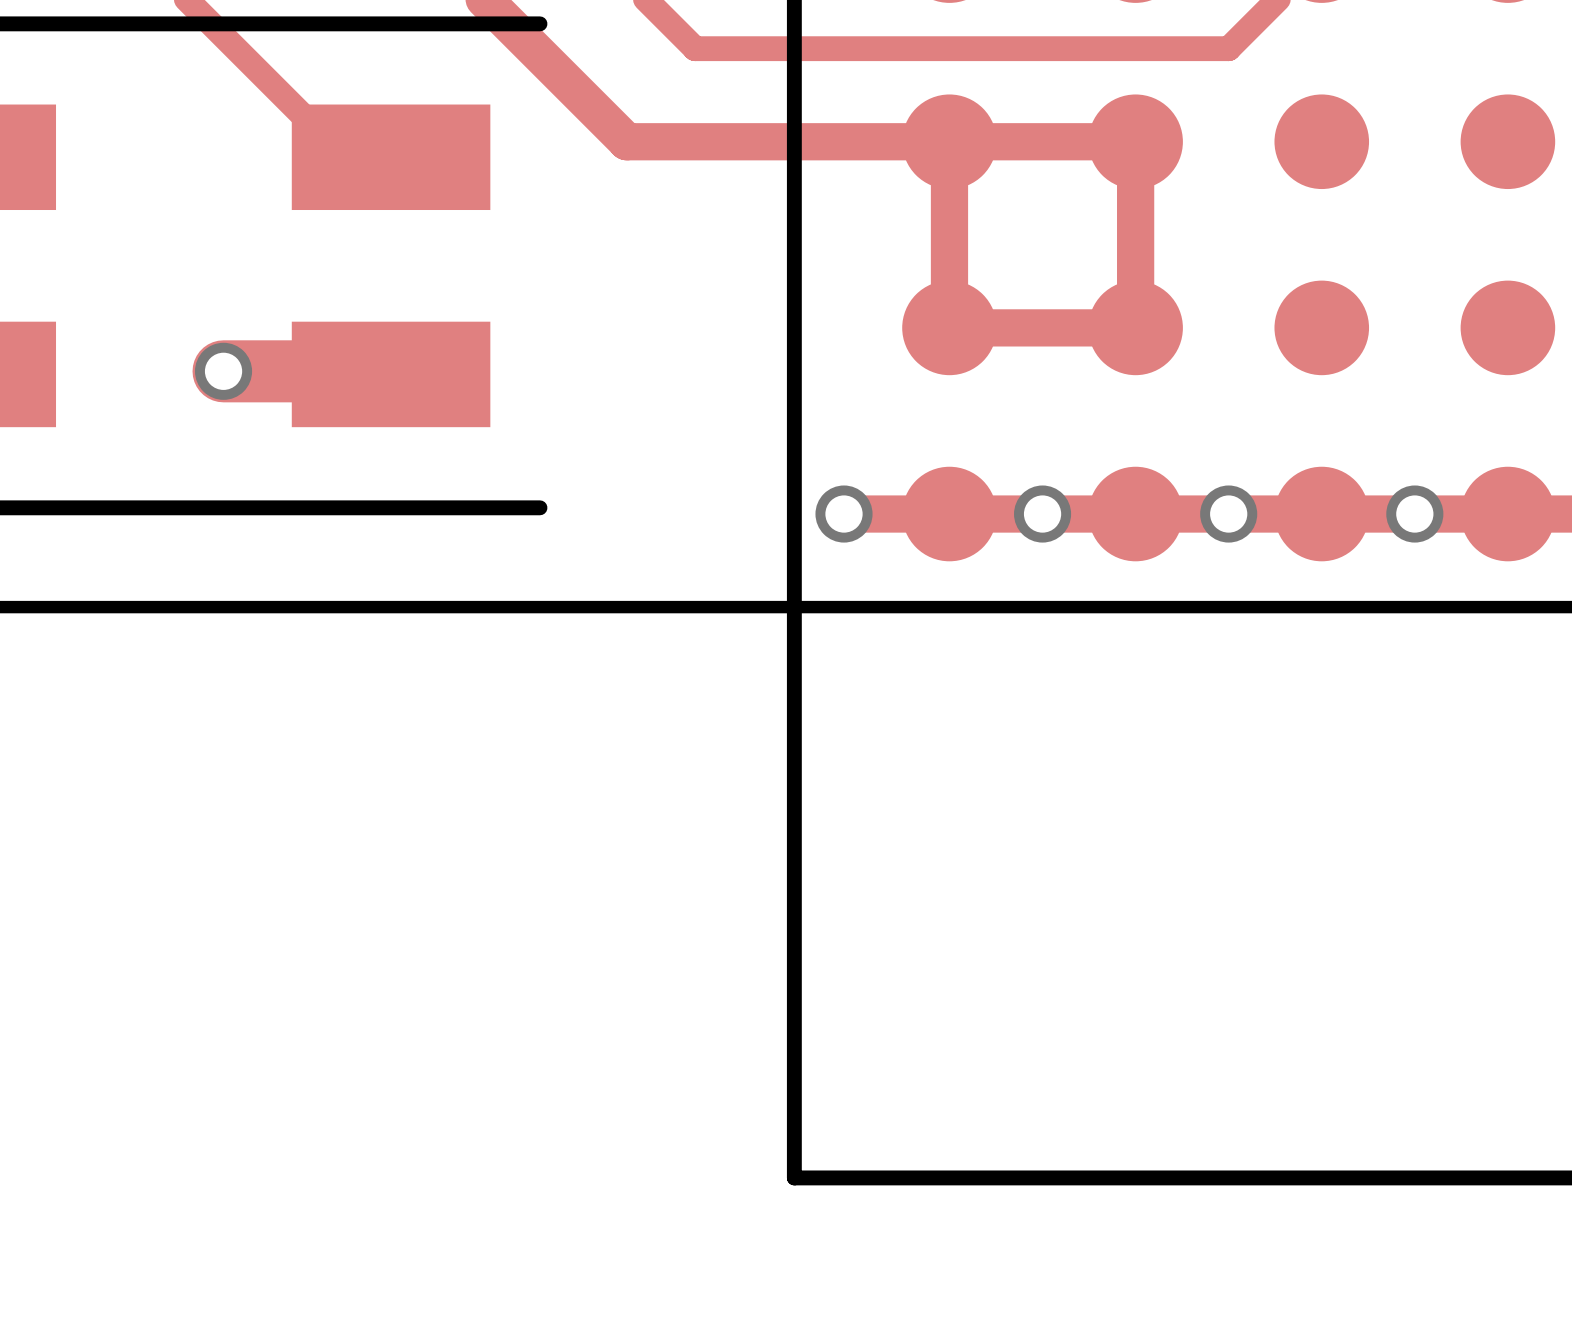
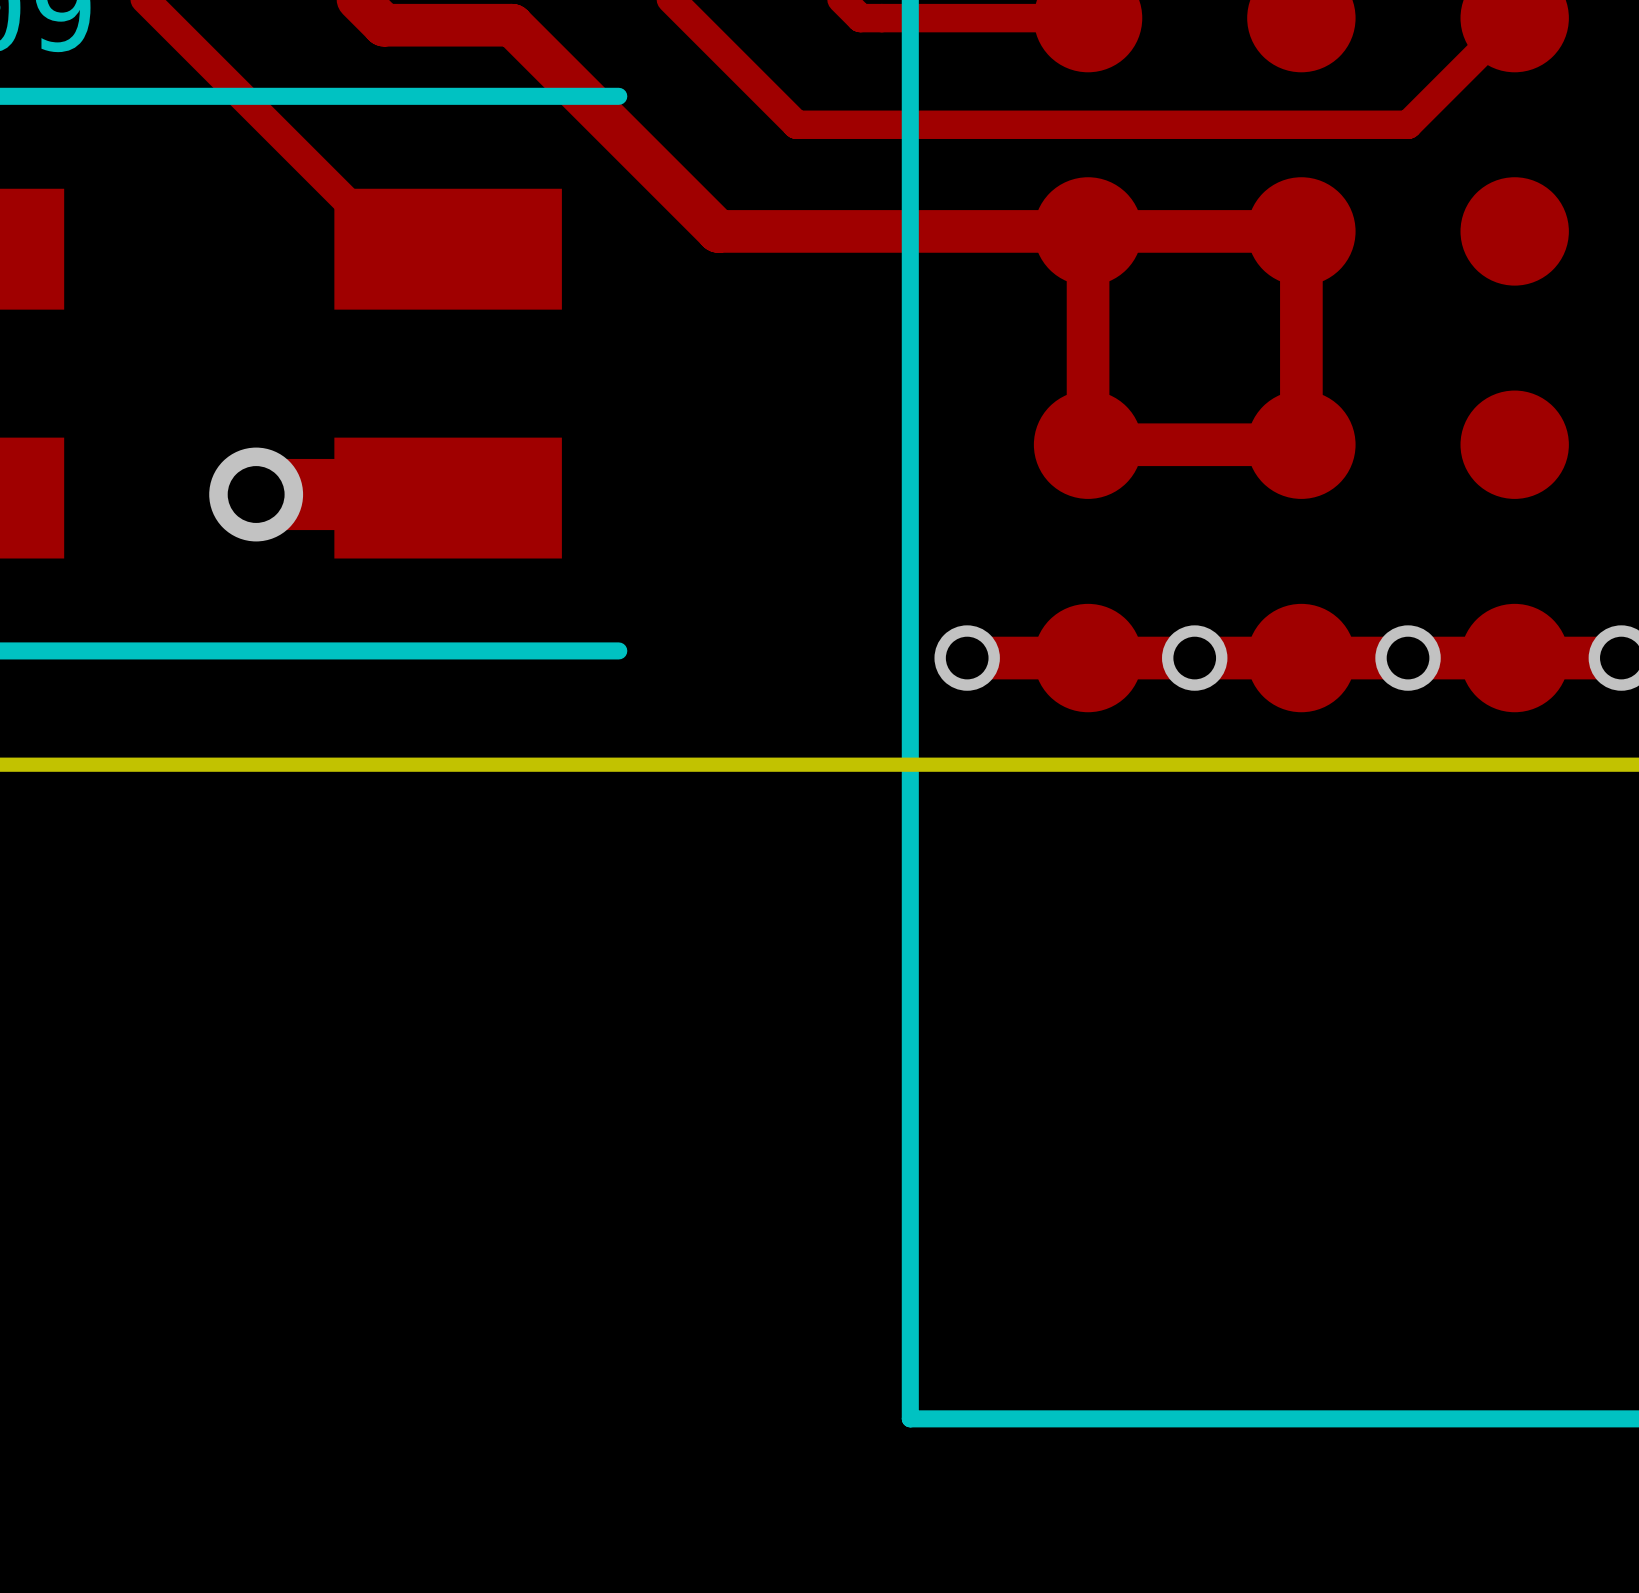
via size: [195, 342, 253, 400] -> [209, 447, 304, 542]

